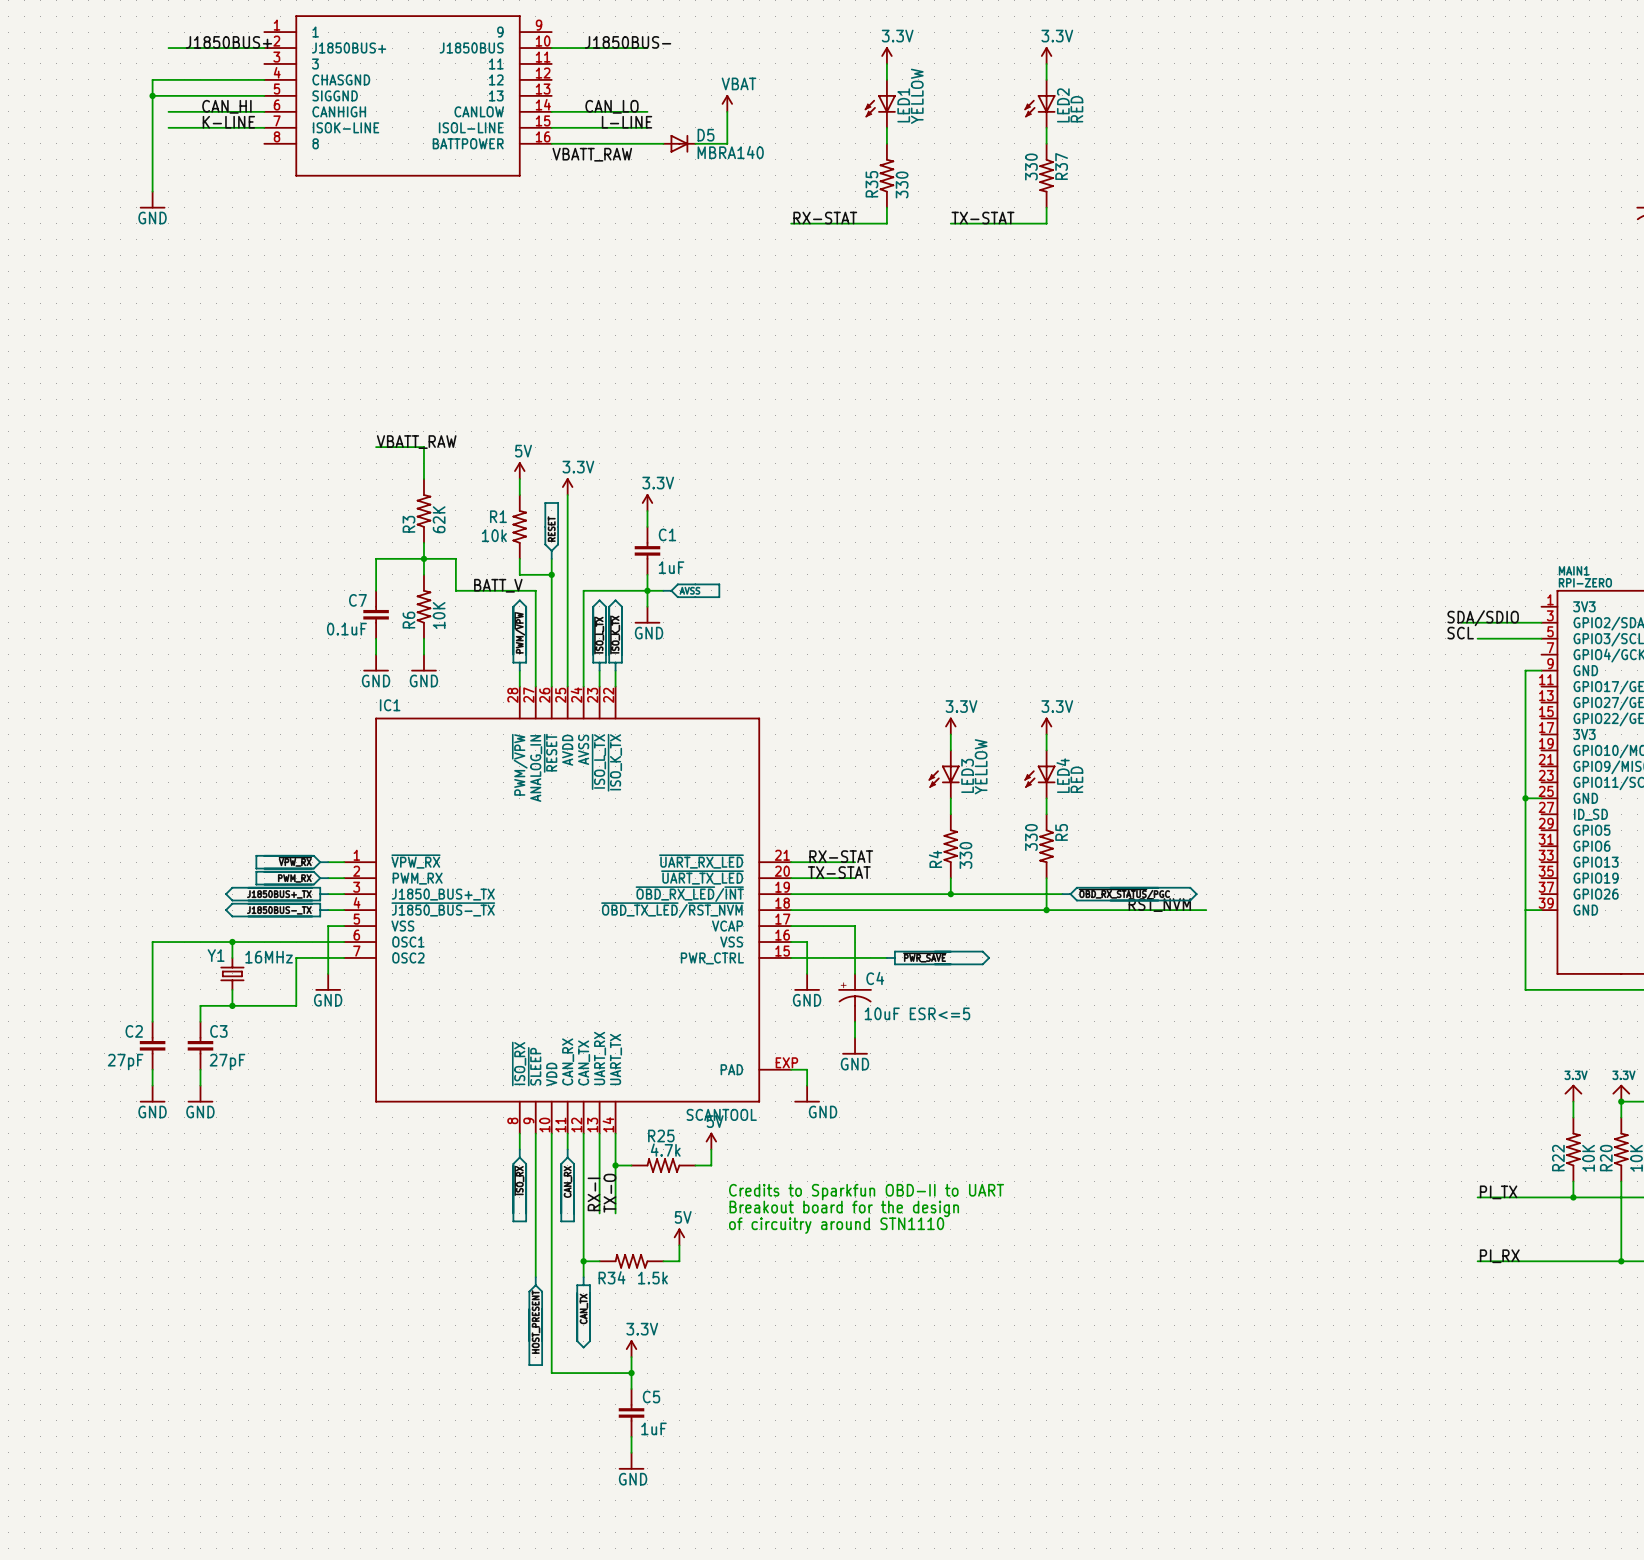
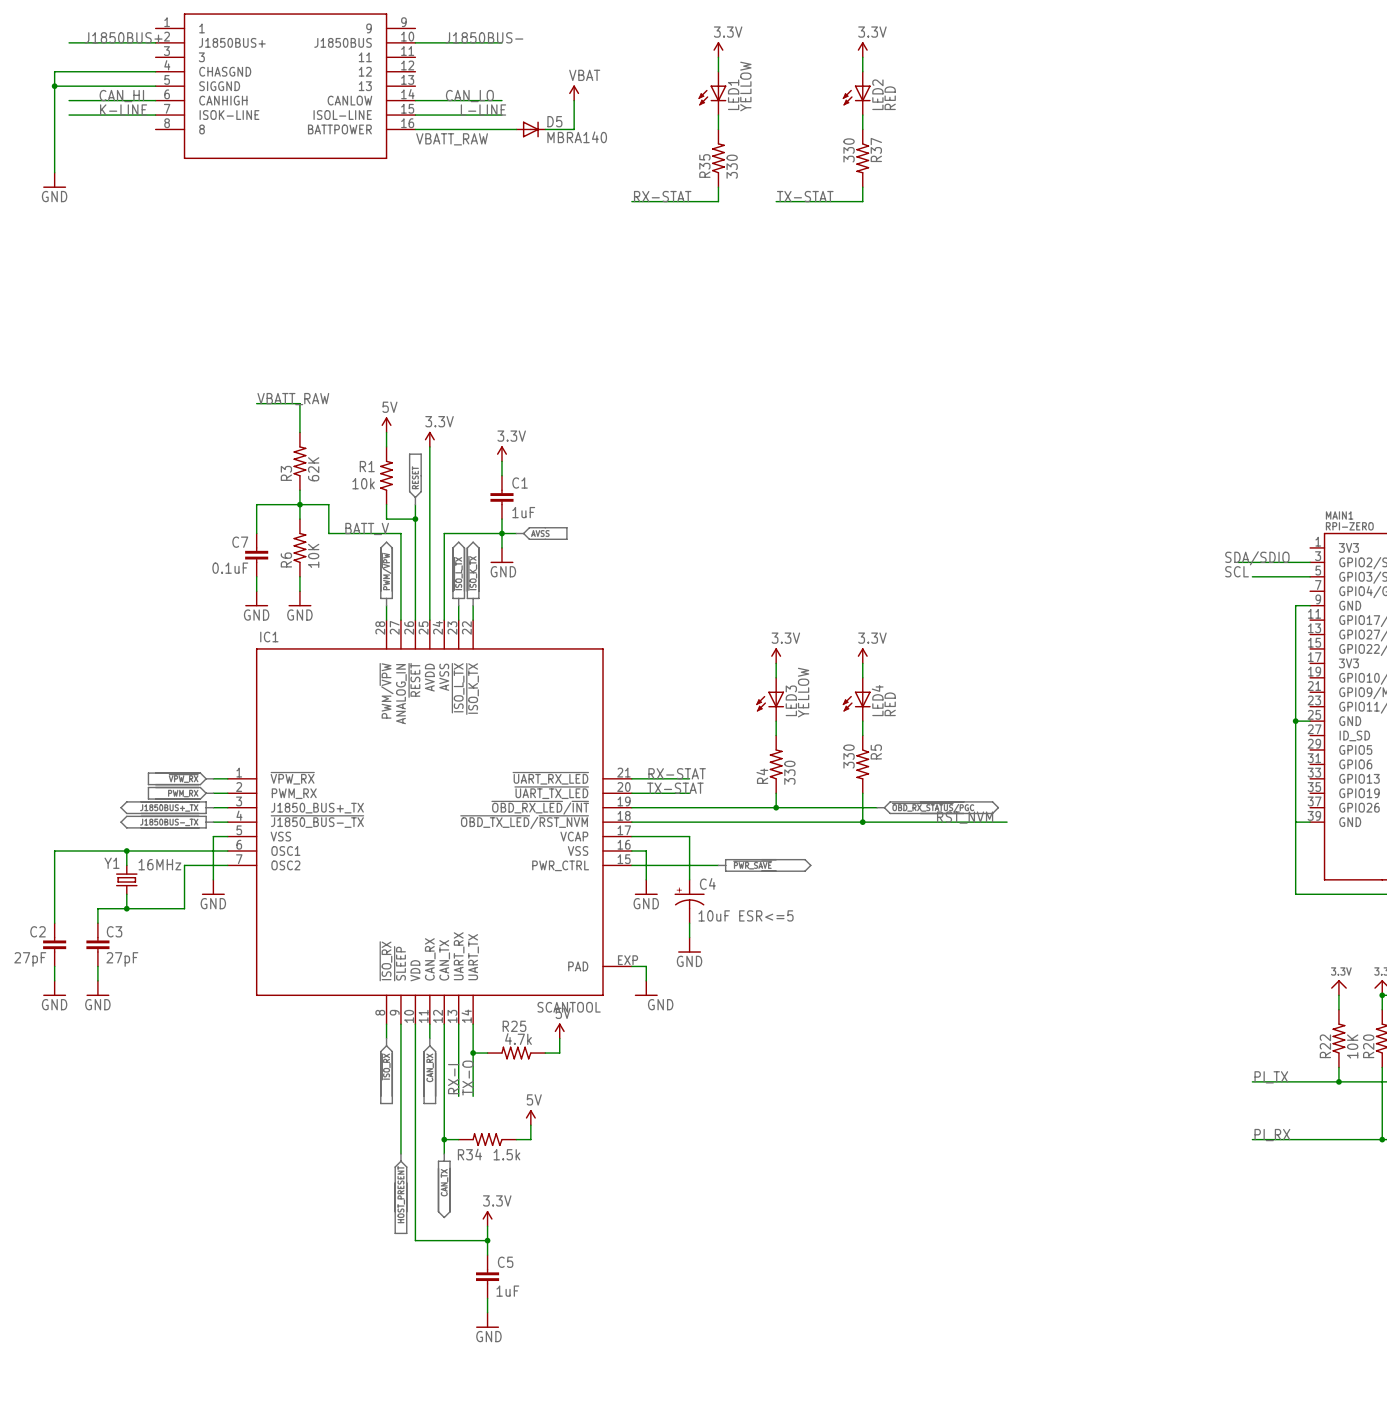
text: Credits to Sparkfun OBD-II to UART (866, 1192) -> none
text: Breakout board for the design (844, 1208) -> none
text: of circuitry around STN1110 (836, 1225) -> none

